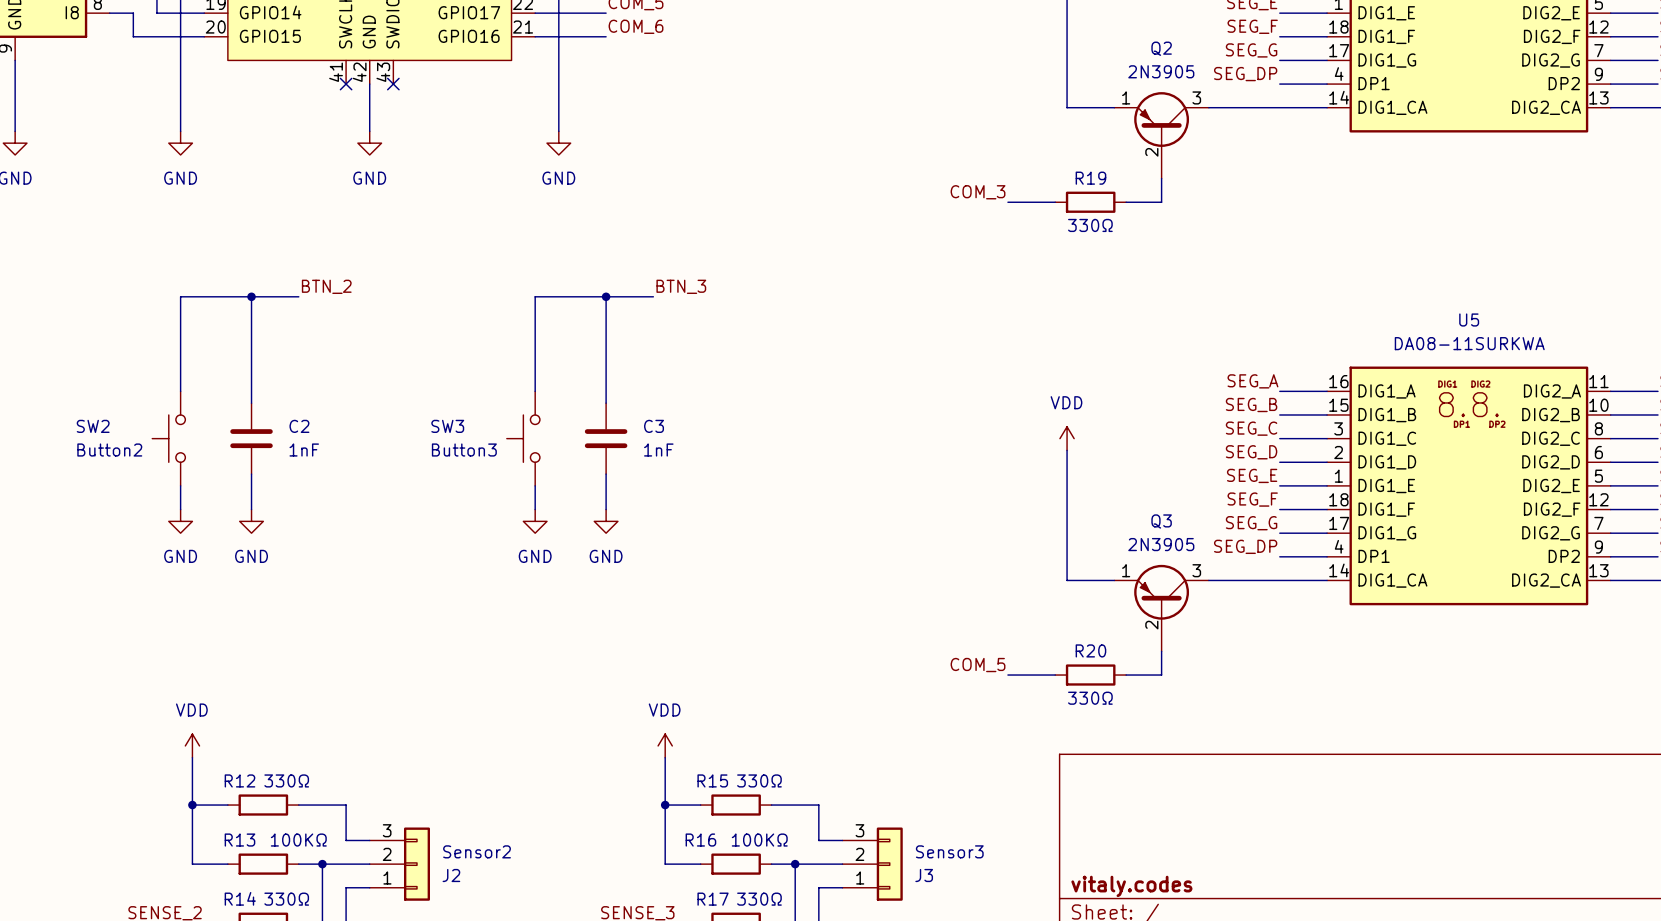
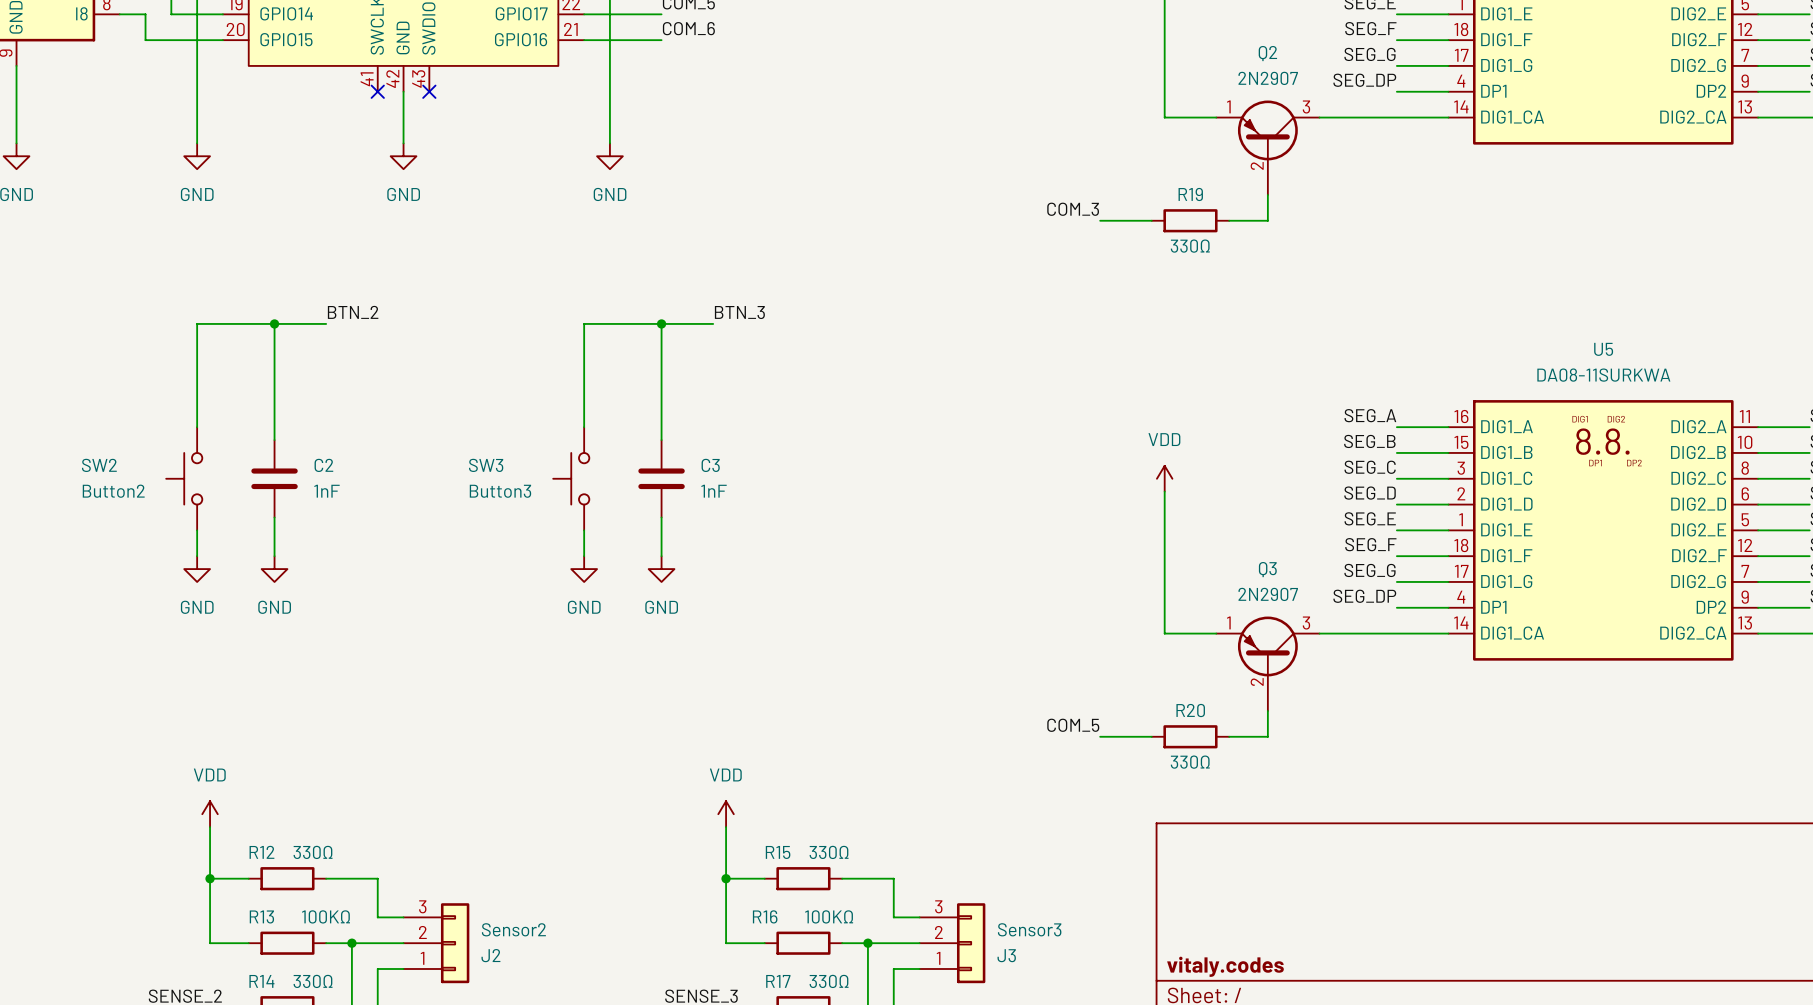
Q2 value: 2N3905 (1161, 71) -> 2N2907 (1268, 78)
Q3 value: 2N3905 (1161, 544) -> 2N2907 (1268, 594)

